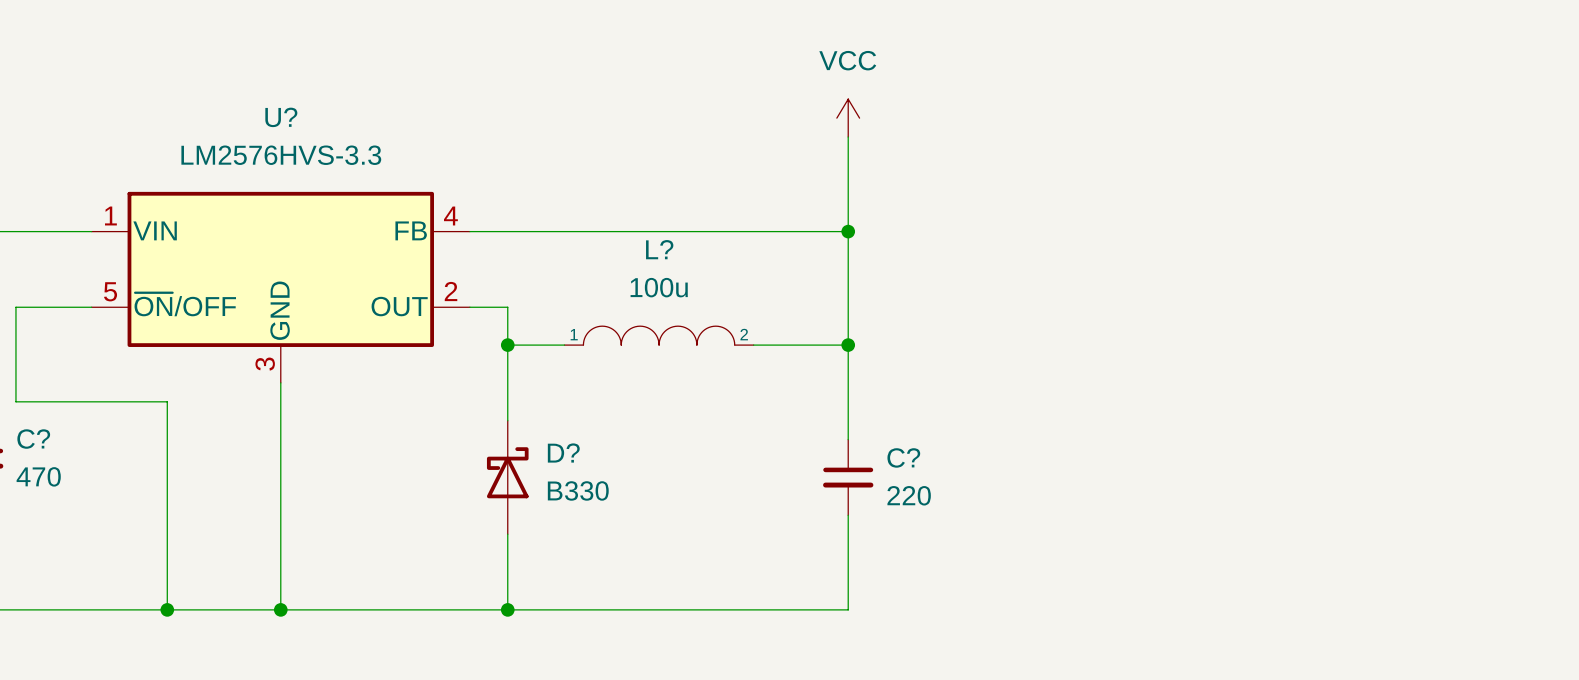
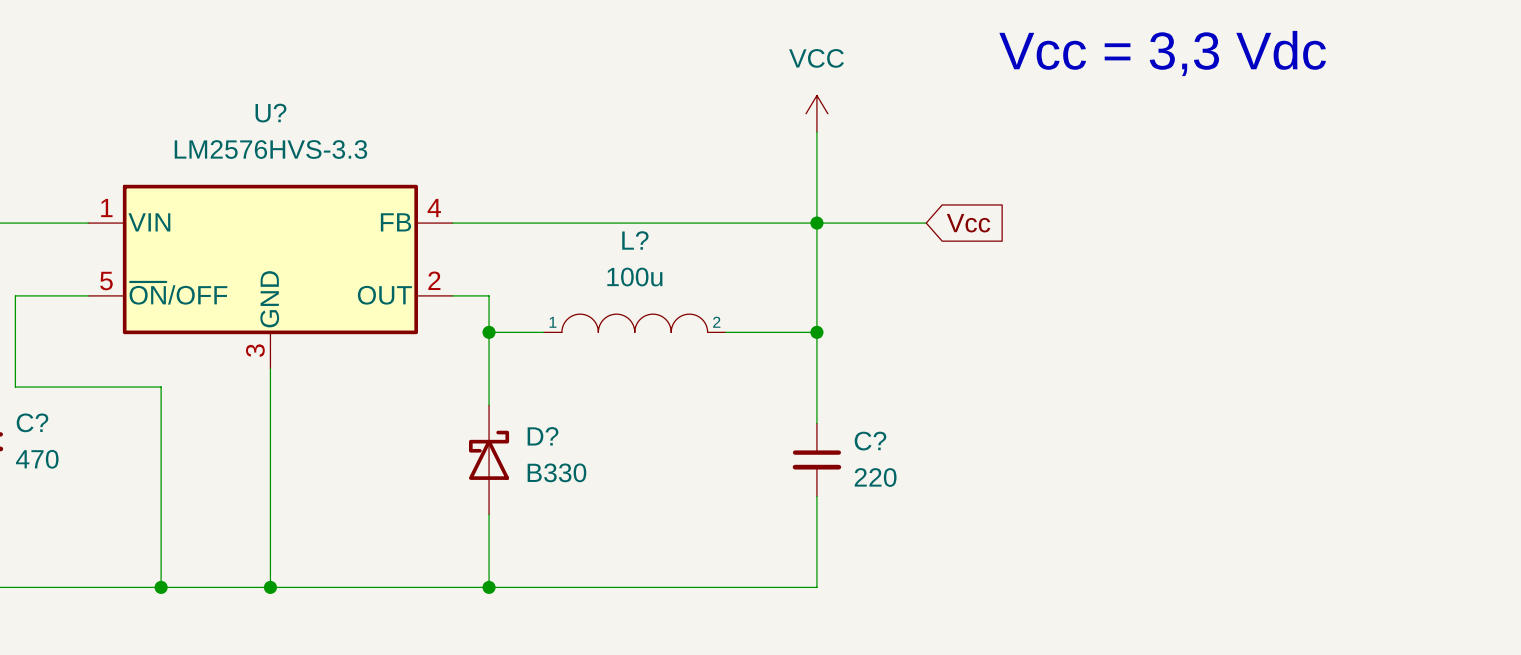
text: none -> Vcc = 3,3 Vdc (1162, 53)
wire: none -> (816, 223) (926, 223)
global label: none -> Vcc (968, 223)

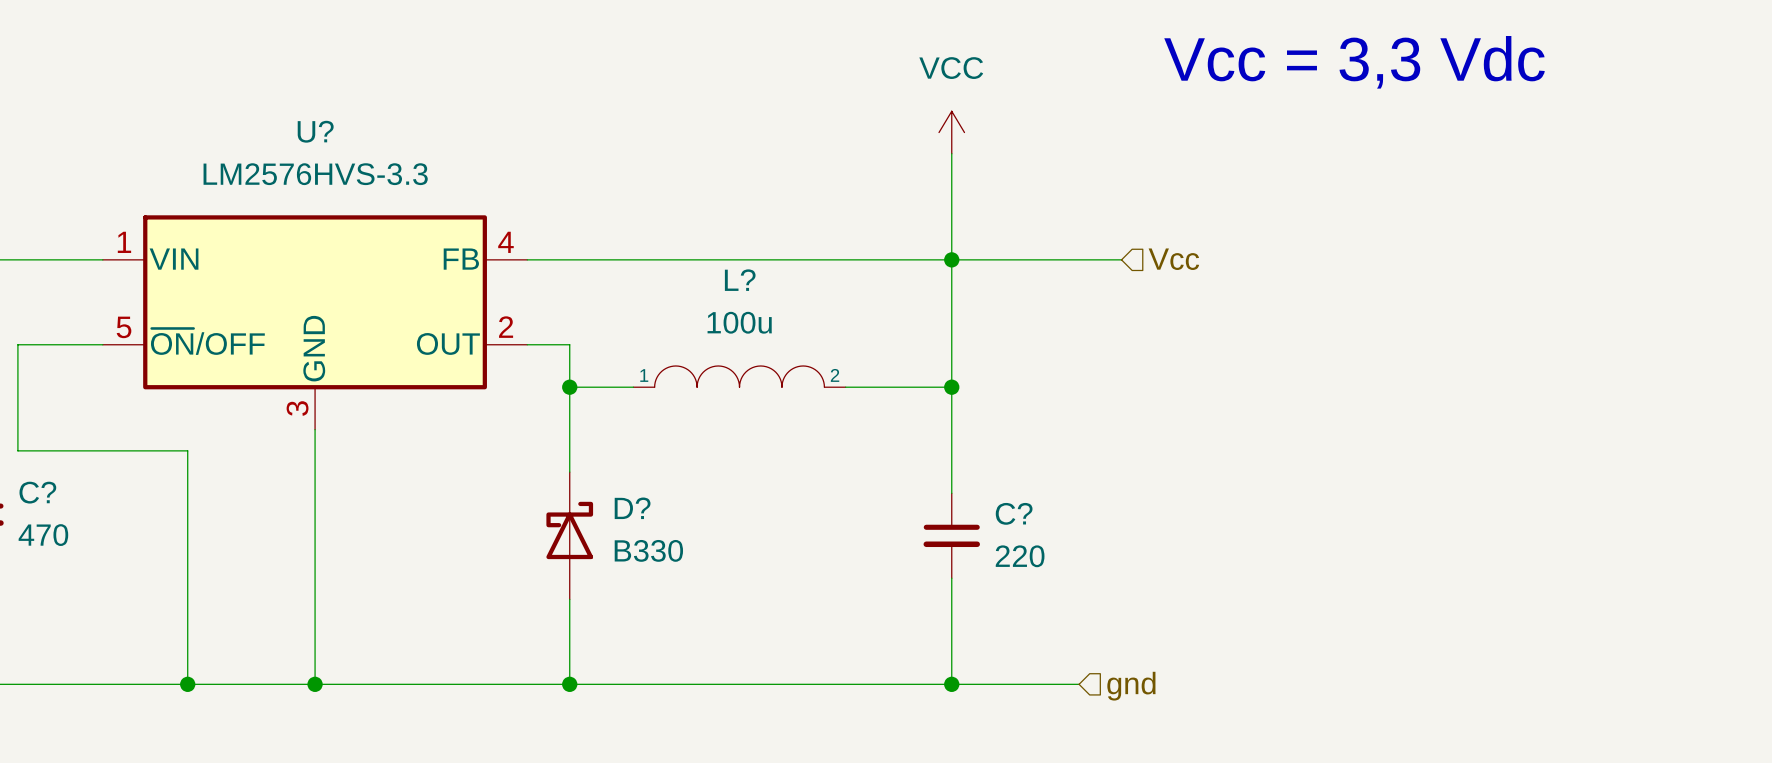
hierarchical label: none -> Vcc (1173, 259)
wire: none -> (1079, 259) (1121, 259)
global label: Vcc (968, 223) -> none
wire: none -> (951, 684) (1079, 684)
junction: none -> (951, 684)
hierarchical label: none -> gnd (1131, 686)

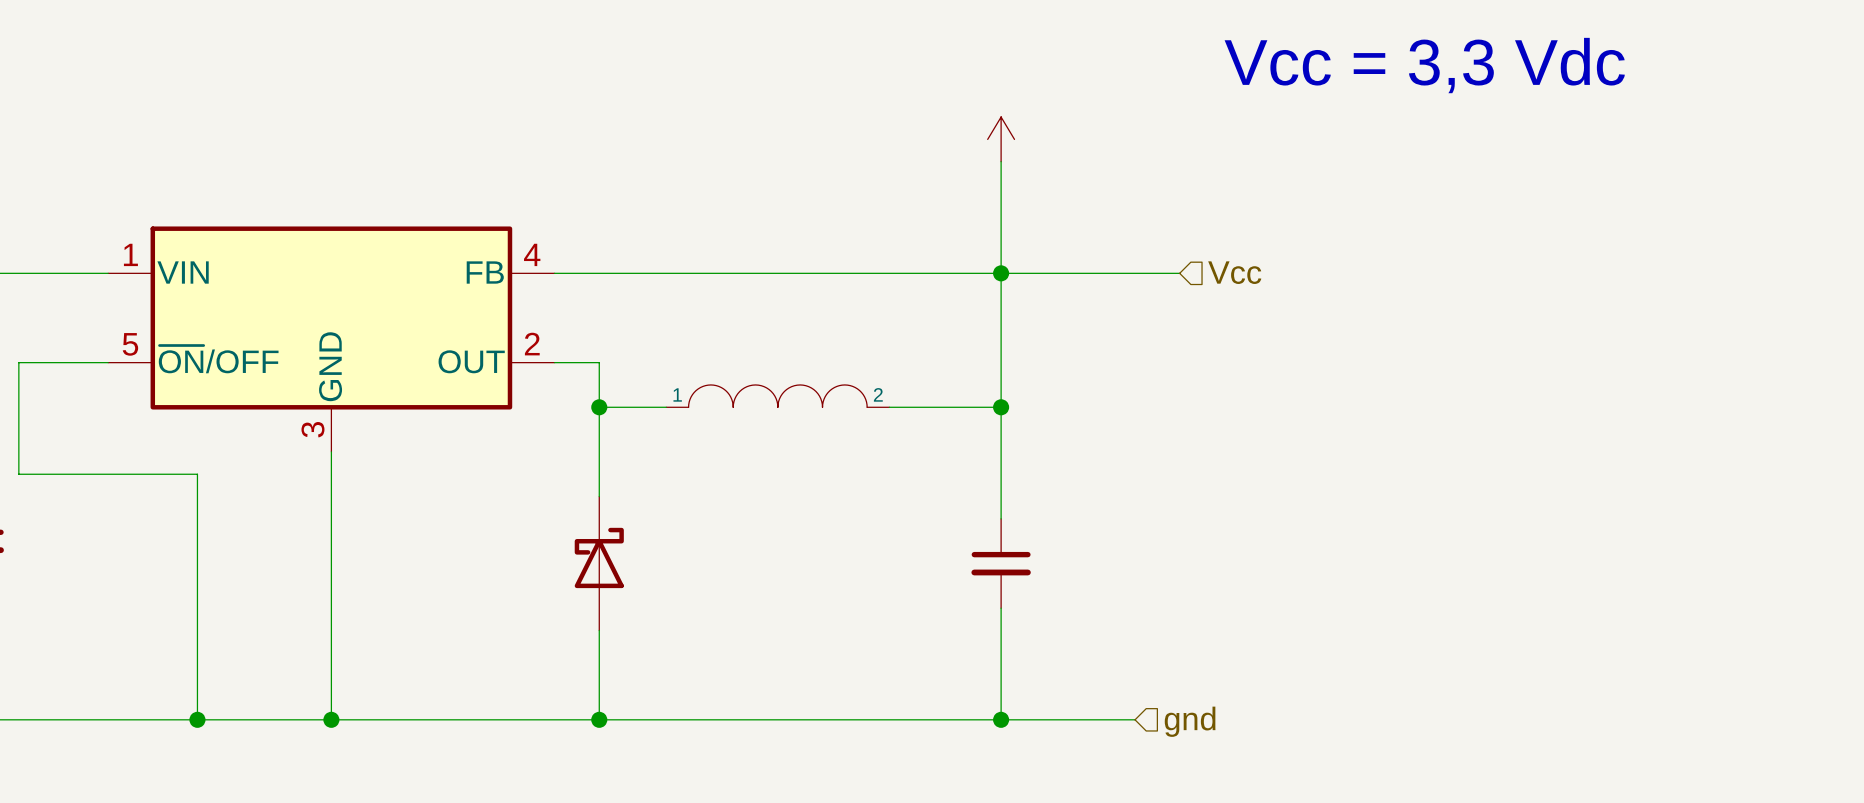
power symbol text: VCC (951, 68) -> none
U? name: U? (315, 131) -> none
U? value: LM2576HVS-3.3 (315, 174) -> none
L? name: L? (740, 280) -> none
L? value: 100u (739, 322) -> none
C? name: C? (37, 492) -> none
D? name: D? (632, 508) -> none
C? name: C? (1014, 513) -> none
C? value: 470 (43, 535) -> none
D? value: B330 (648, 550) -> none
C? value: 220 (1020, 556) -> none

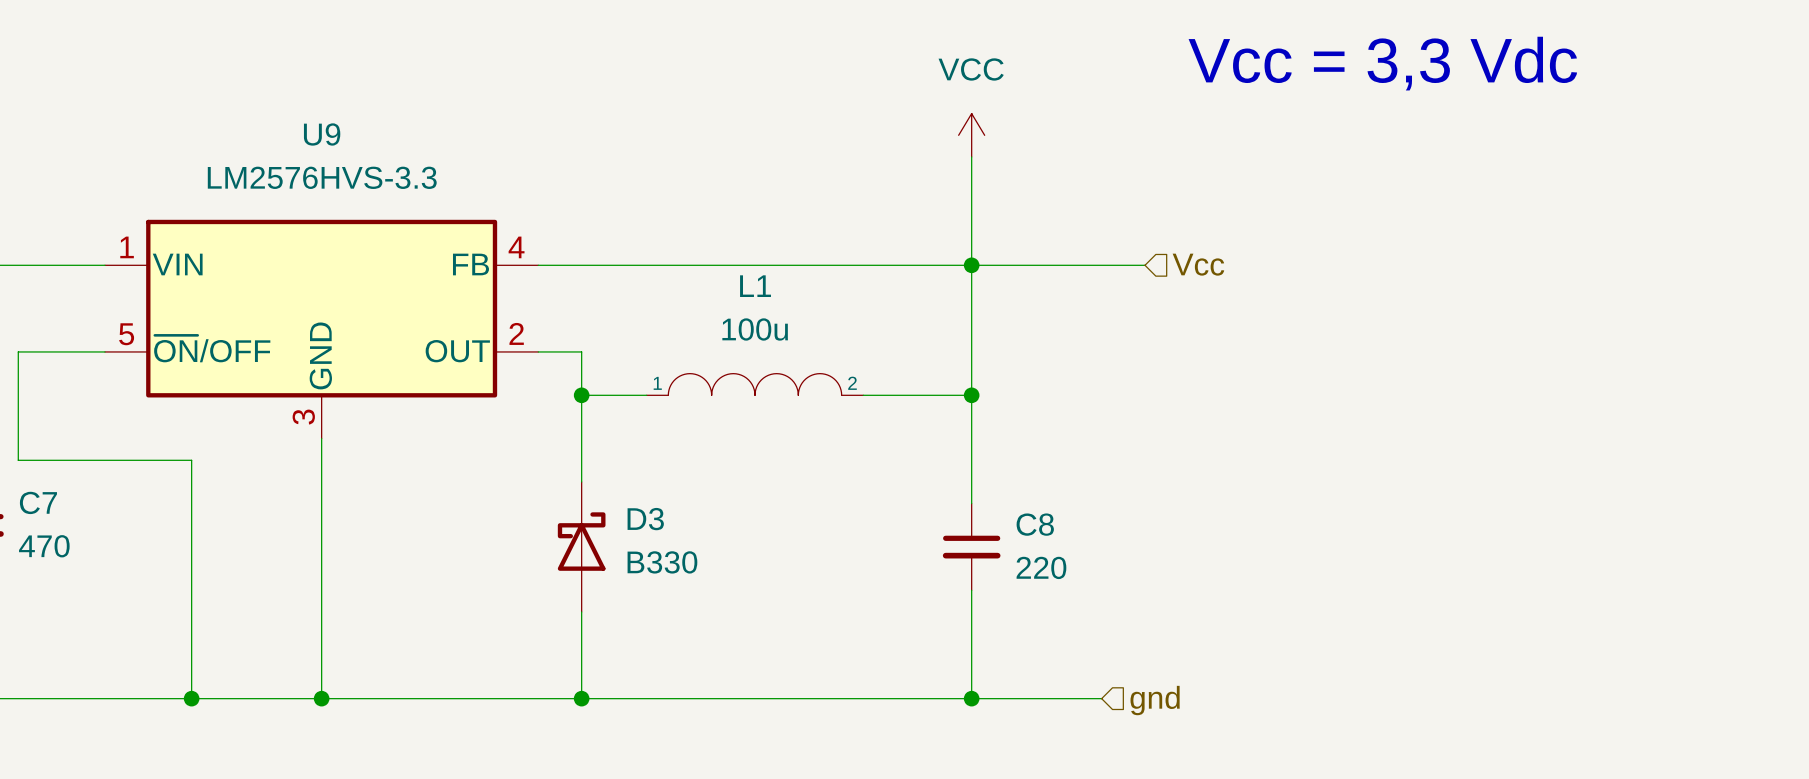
power symbol text: none -> VCC (971, 69)
U9 name: none -> U9 (322, 134)
U9 value: none -> LM2576HVS-3.3 (322, 177)
L1 name: none -> L1 (755, 286)
L1 value: none -> 100u (755, 329)
C7 name: none -> C7 (38, 502)
D3 name: none -> D3 (645, 519)
C8 name: none -> C8 (1035, 524)
C7 value: none -> 470 (44, 546)
D3 value: none -> B330 (662, 562)
C8 value: none -> 220 (1041, 567)

